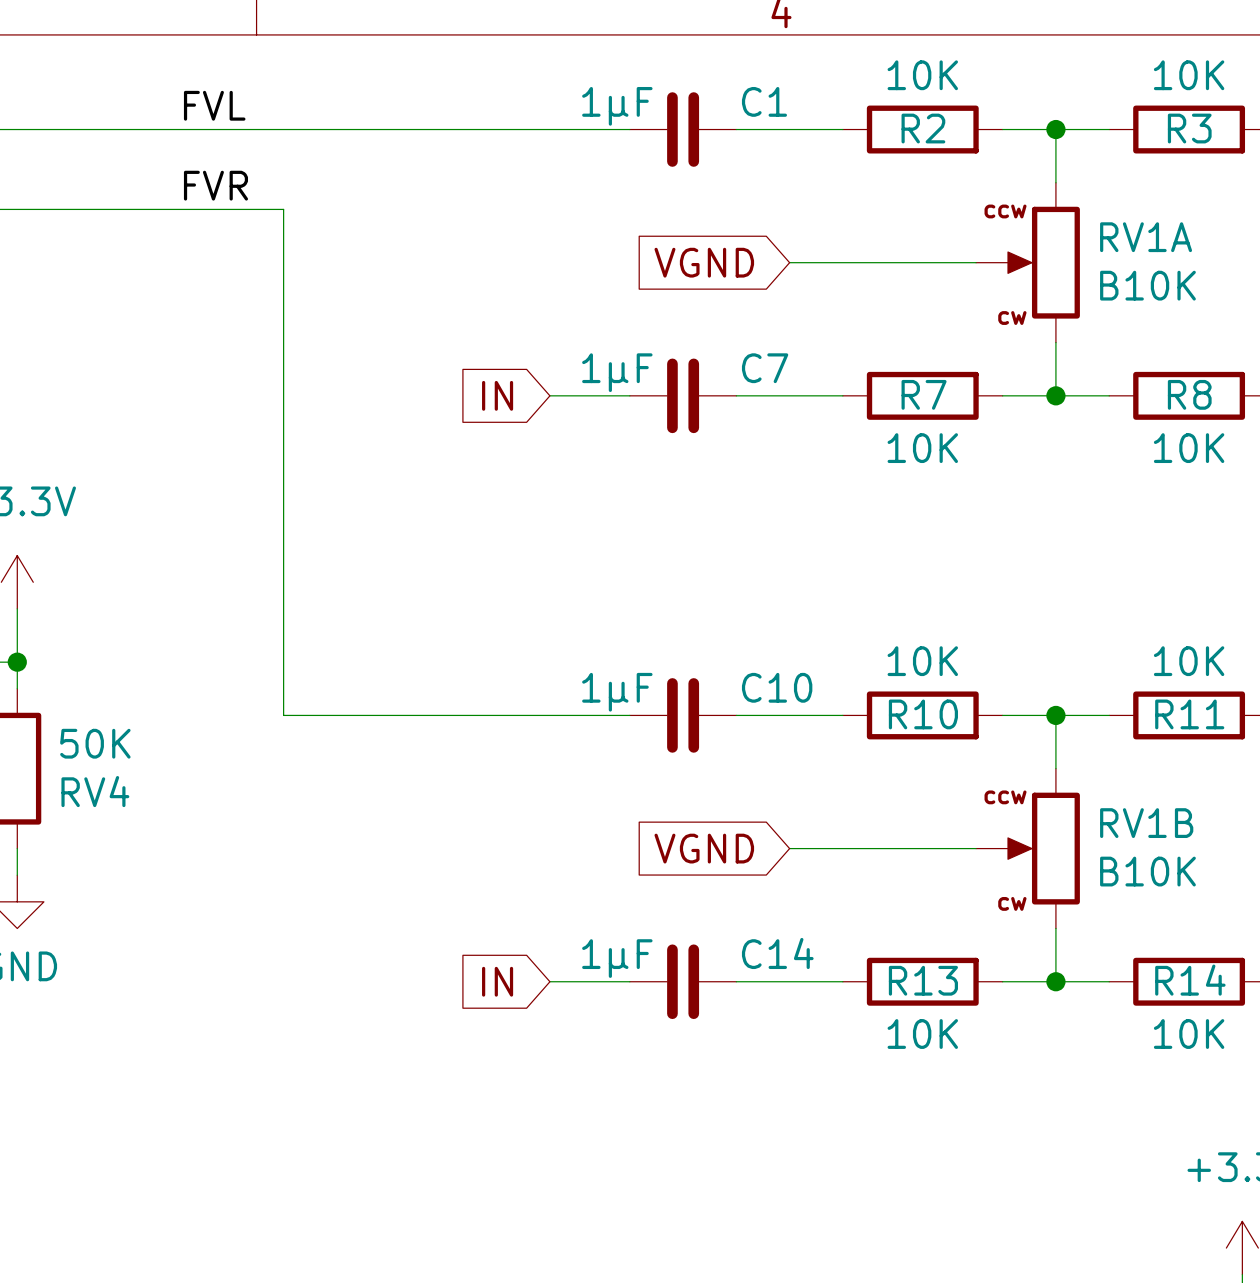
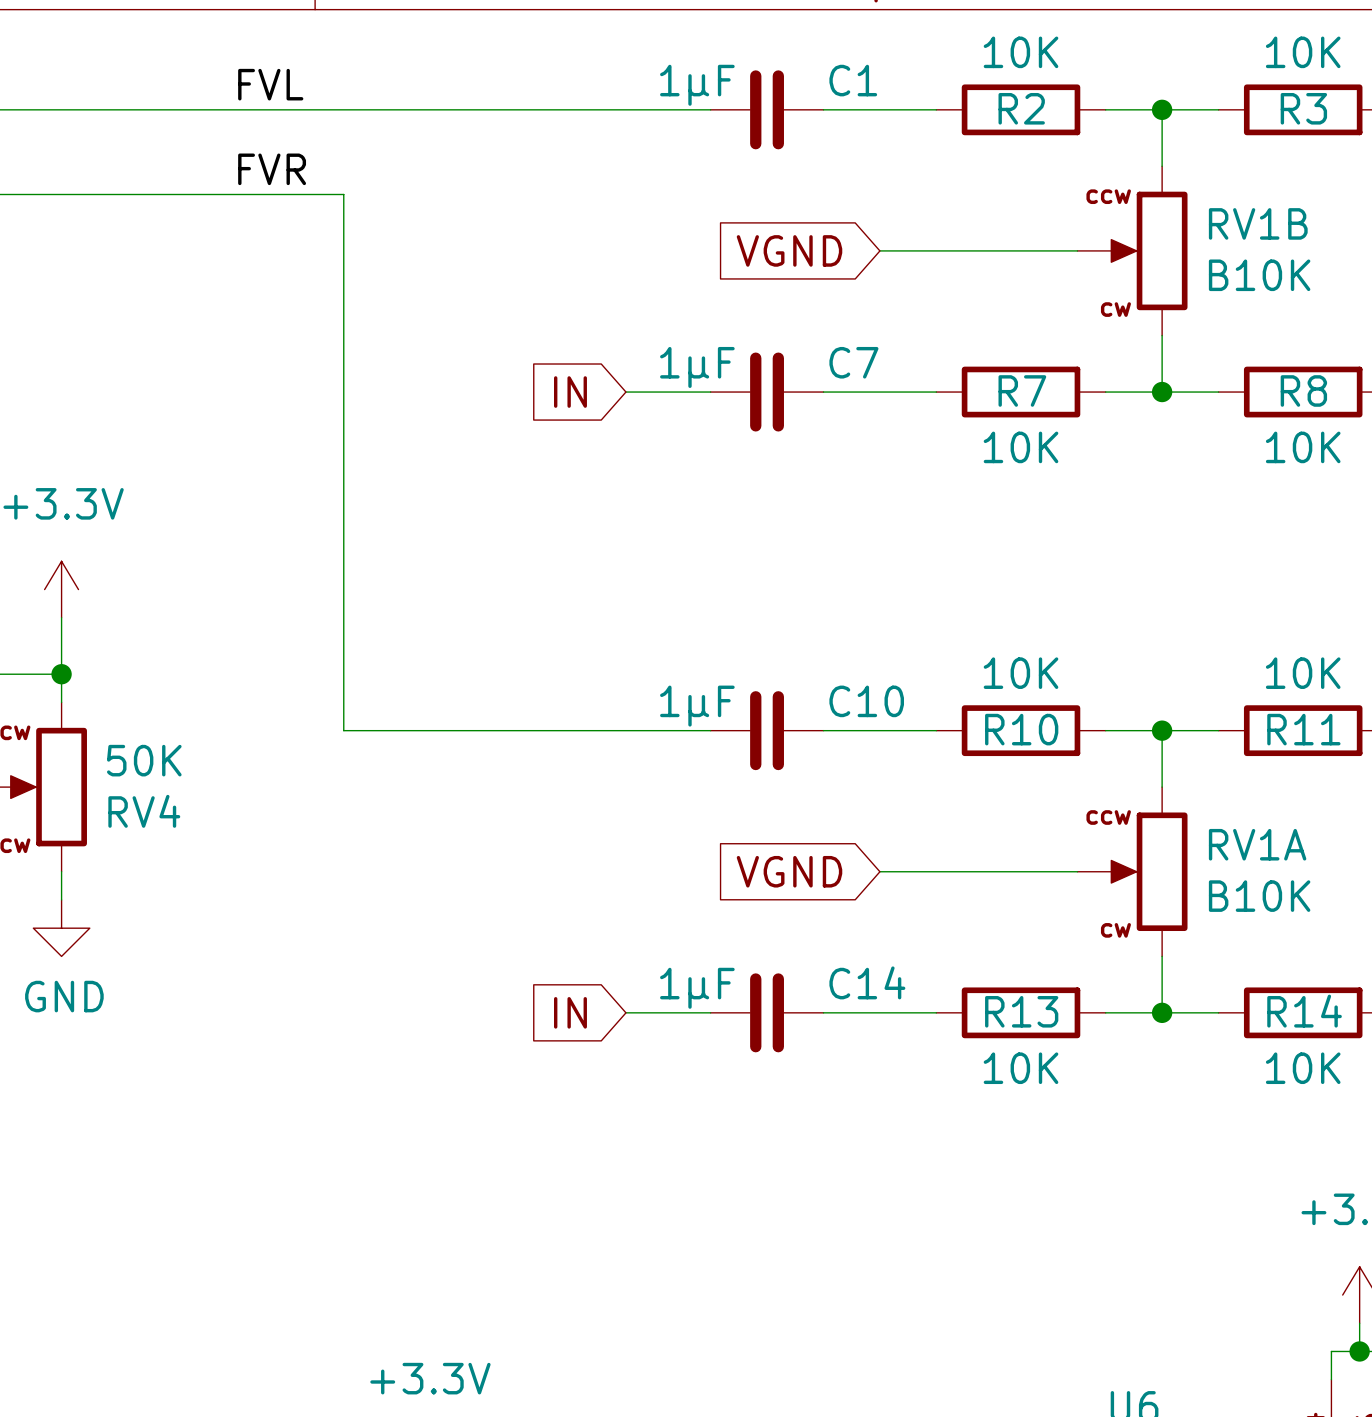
RV1A name: RV1A (1146, 237) -> RV1B (1258, 223)
RV1B name: RV1B (1146, 823) -> RV1A (1257, 844)

